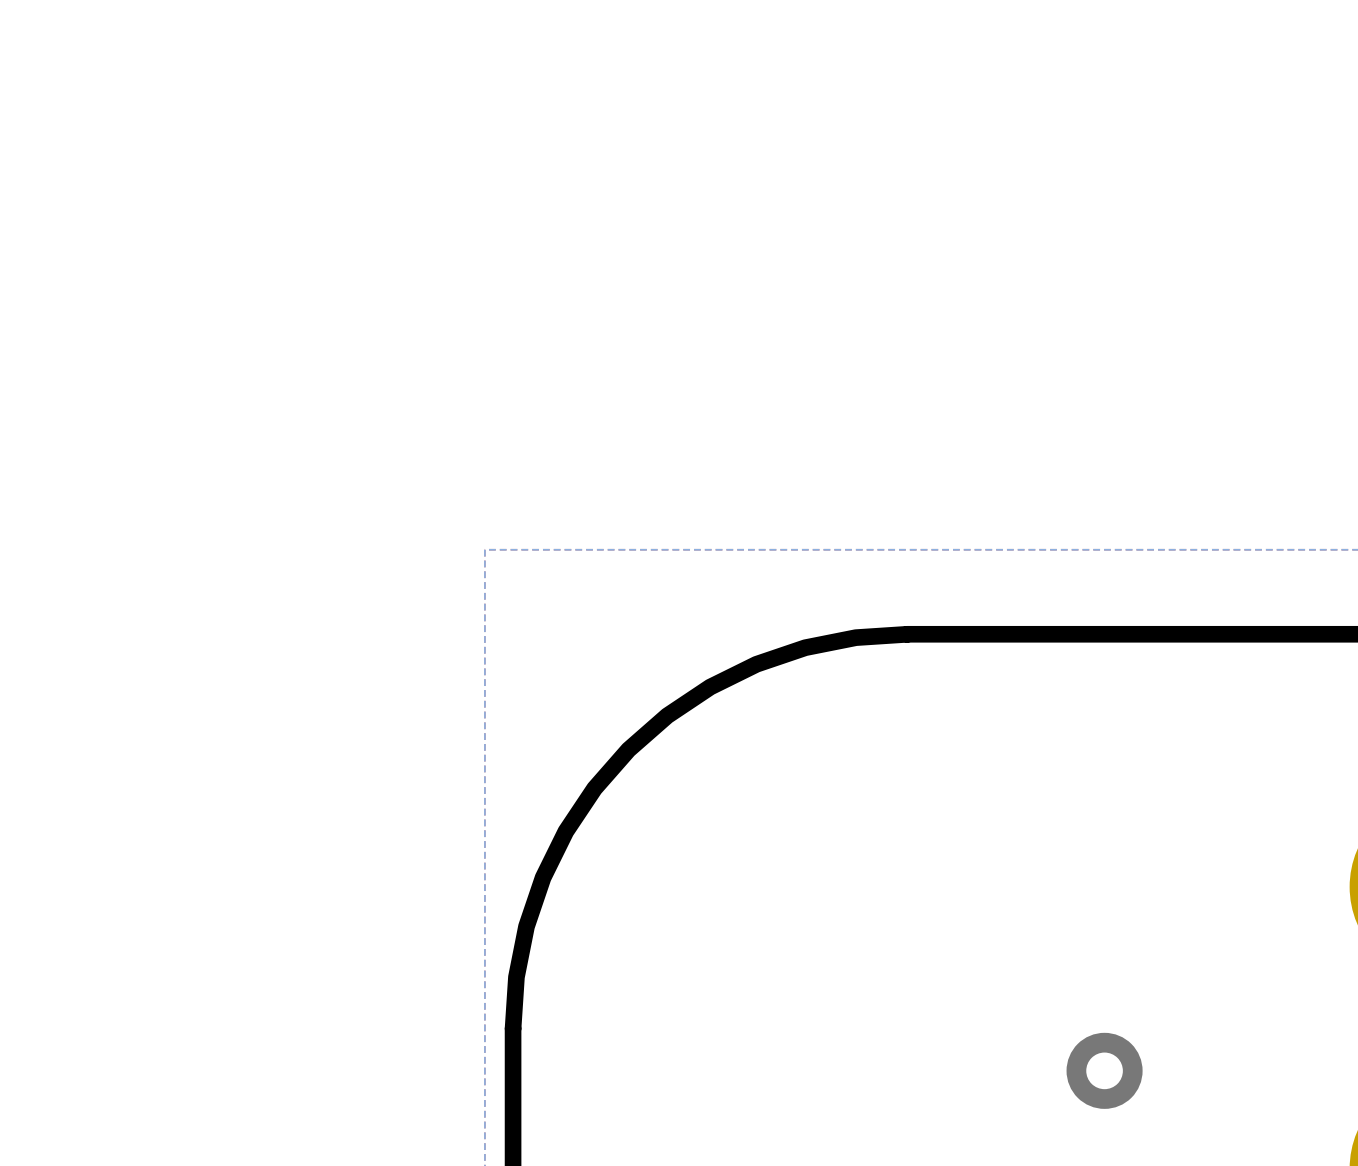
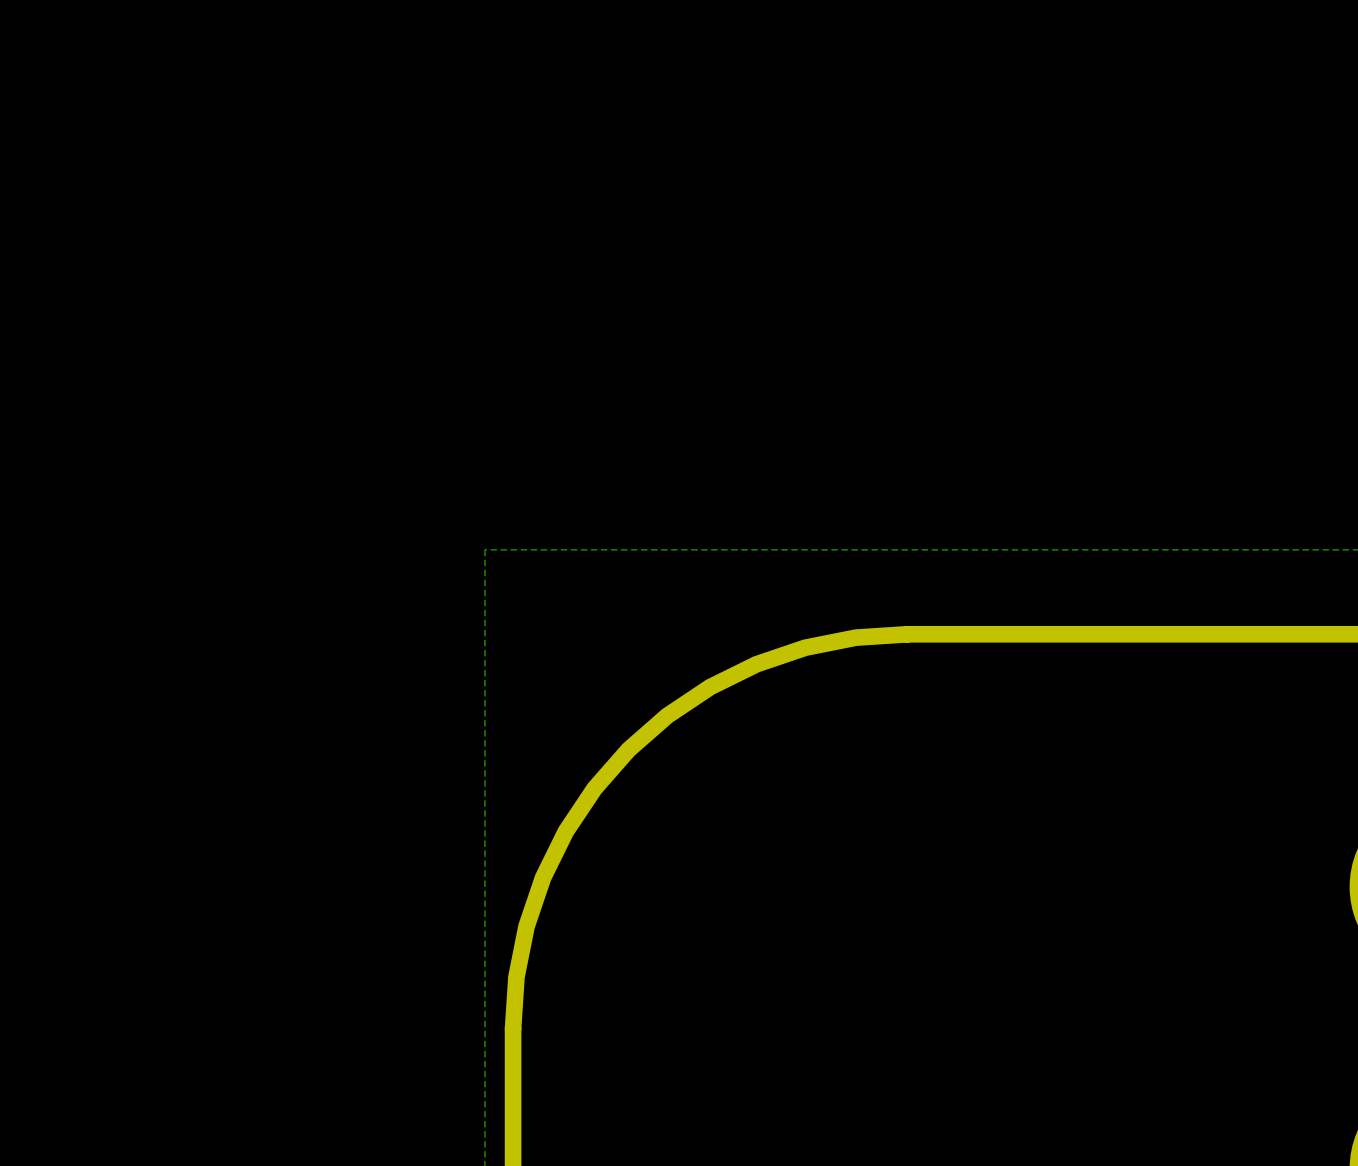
via: (1104, 1070) -> none

